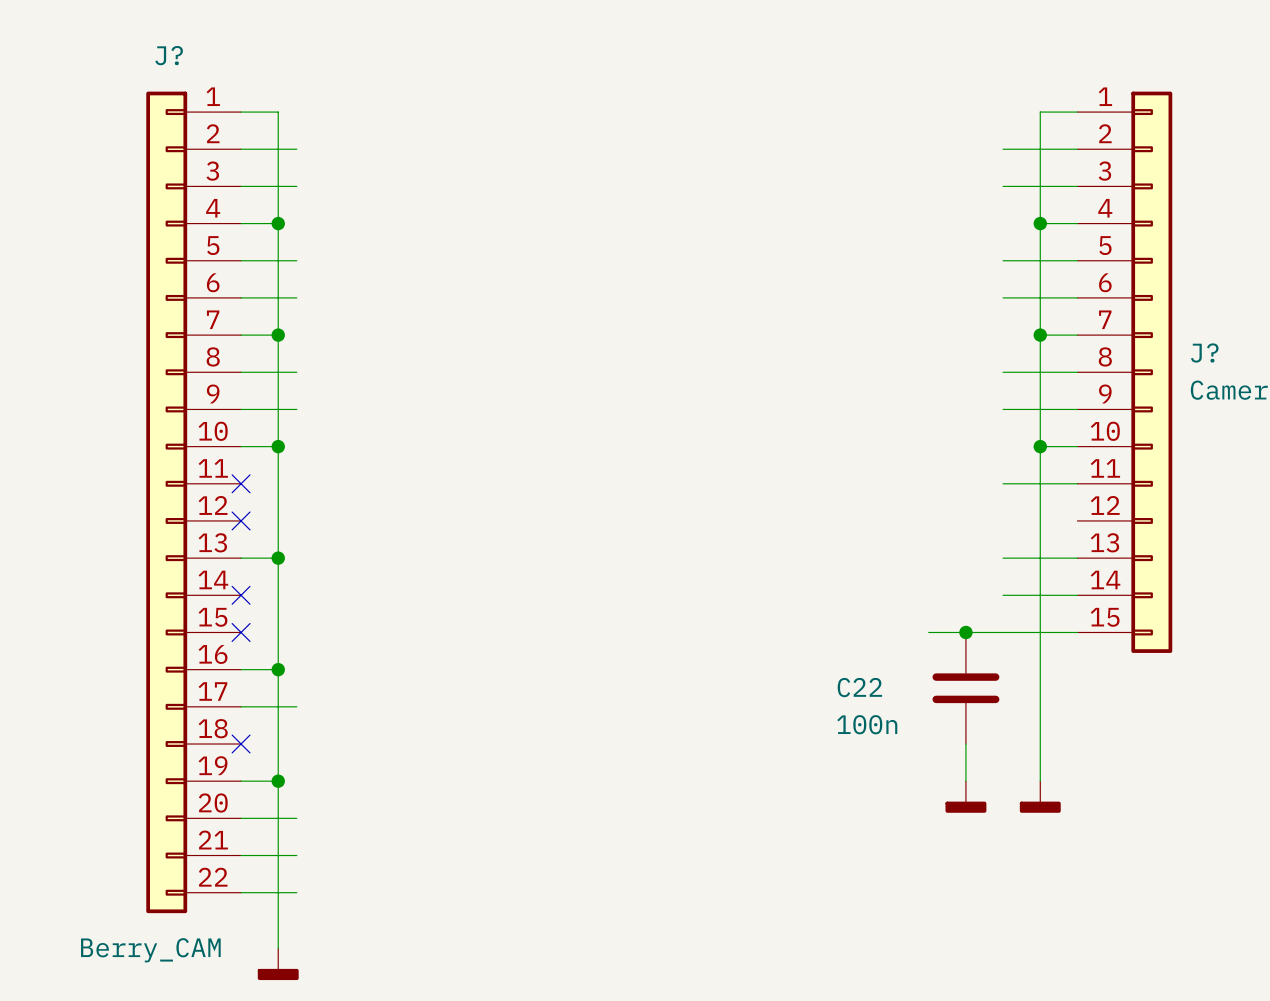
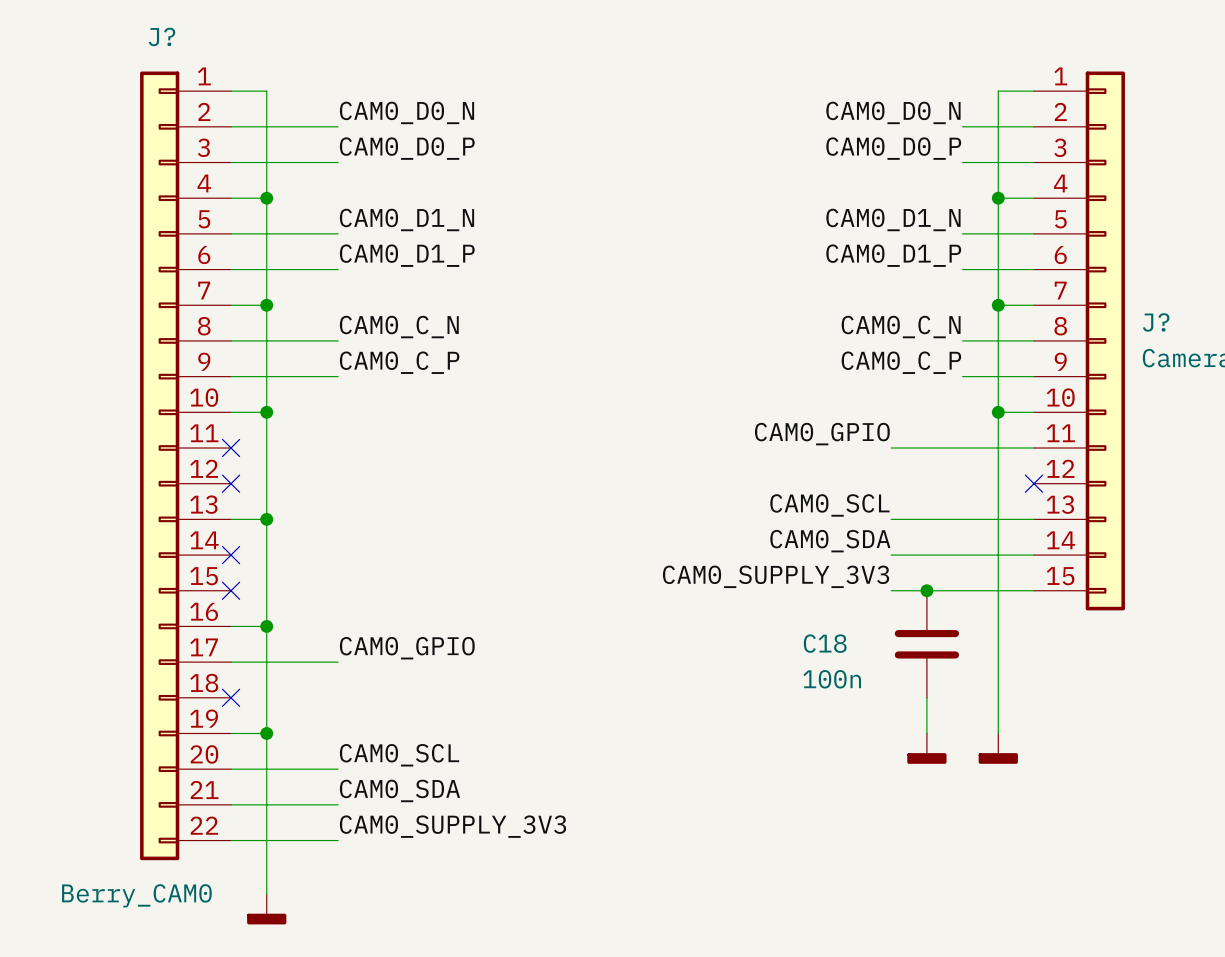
label: none -> CAM0_D0_N (406, 112)
label: none -> CAM0_D0_N (893, 112)
wire: none -> (284, 126) (338, 126)
label: none -> CAM0_D0_P (407, 148)
label: none -> CAM0_D0_P (893, 148)
wire: none -> (284, 162) (338, 162)
label: none -> CAM0_D1_N (406, 219)
label: none -> CAM0_D1_N (893, 219)
wire: none -> (284, 233) (338, 233)
label: none -> CAM0_D1_P (407, 255)
label: none -> CAM0_D1_P (893, 255)
wire: none -> (284, 269) (338, 269)
label: none -> CAM0_C_N (399, 327)
label: none -> CAM0_C_N (901, 327)
wire: none -> (284, 340) (338, 340)
label: none -> CAM0_C_P (399, 362)
label: none -> CAM0_C_P (901, 362)
wire: none -> (284, 376) (338, 376)
label: none -> CAM0_GPIO (822, 434)
wire: none -> (891, 448) (962, 448)
no-connect mark: none -> (1033, 483)
label: none -> CAM0_SCL (829, 505)
wire: none -> (891, 519) (962, 519)
label: none -> CAM0_SDA (830, 541)
wire: none -> (891, 555) (962, 555)
label: none -> CAM0_SUPPLY_3V3 (776, 576)
C22 name: C22 (859, 687) -> C18 (825, 643)
label: none -> CAM0_GPIO (407, 648)
wire: none -> (284, 662) (338, 662)
label: none -> CAM0_SCL (399, 755)
wire: none -> (284, 769) (338, 769)
label: none -> CAM0_SDA (399, 790)
wire: none -> (284, 804) (338, 804)
label: none -> CAM0_SUPPLY_3V3 (452, 826)
wire: none -> (284, 840) (338, 840)
J? value: Berry_CAM (150, 950) -> Berry_CAM0 (136, 895)

